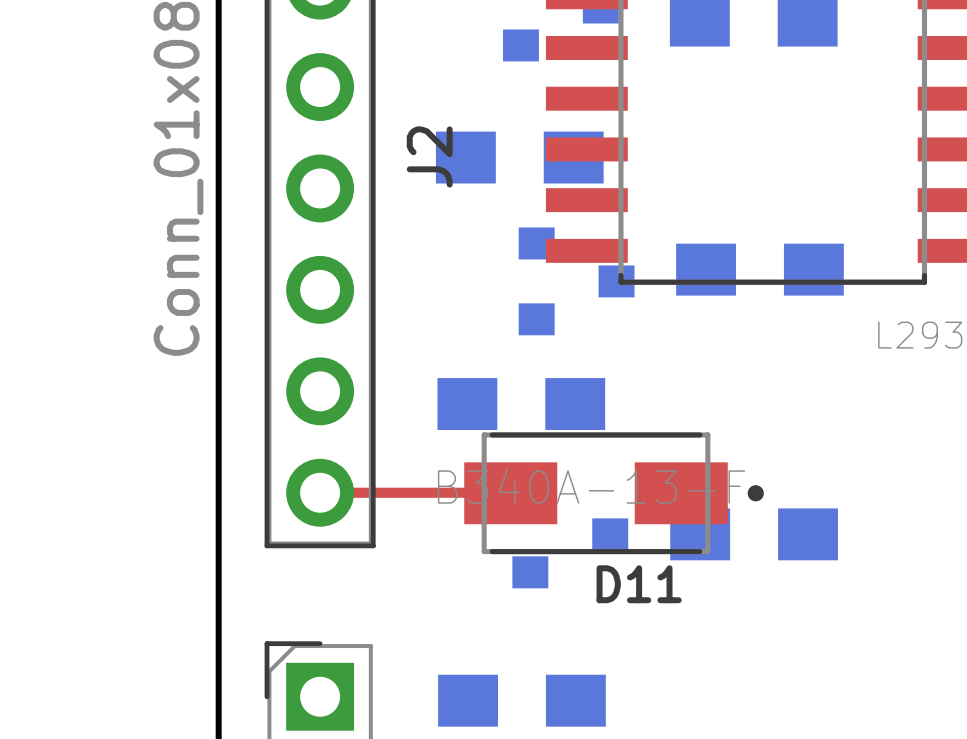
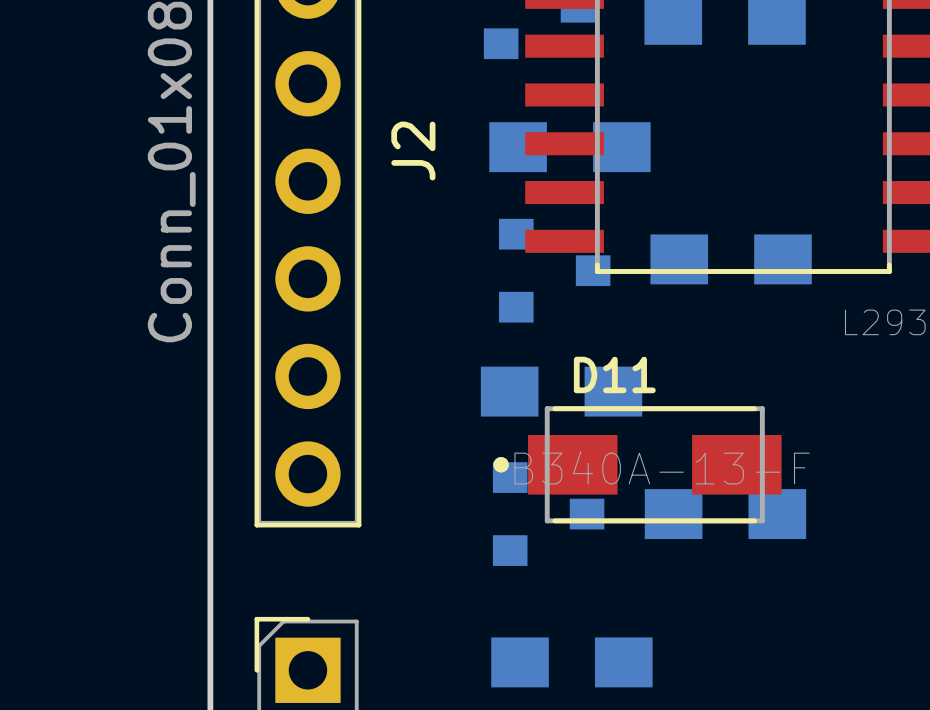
part position: (519, 157) -> (569, 147)
part position: (521, 404) -> (561, 391)
top track: (320, 492) (510, 492) -> none
D11 rotation: 0° (613, 493) -> 180° (637, 464)
part position: (521, 700) -> (571, 662)

